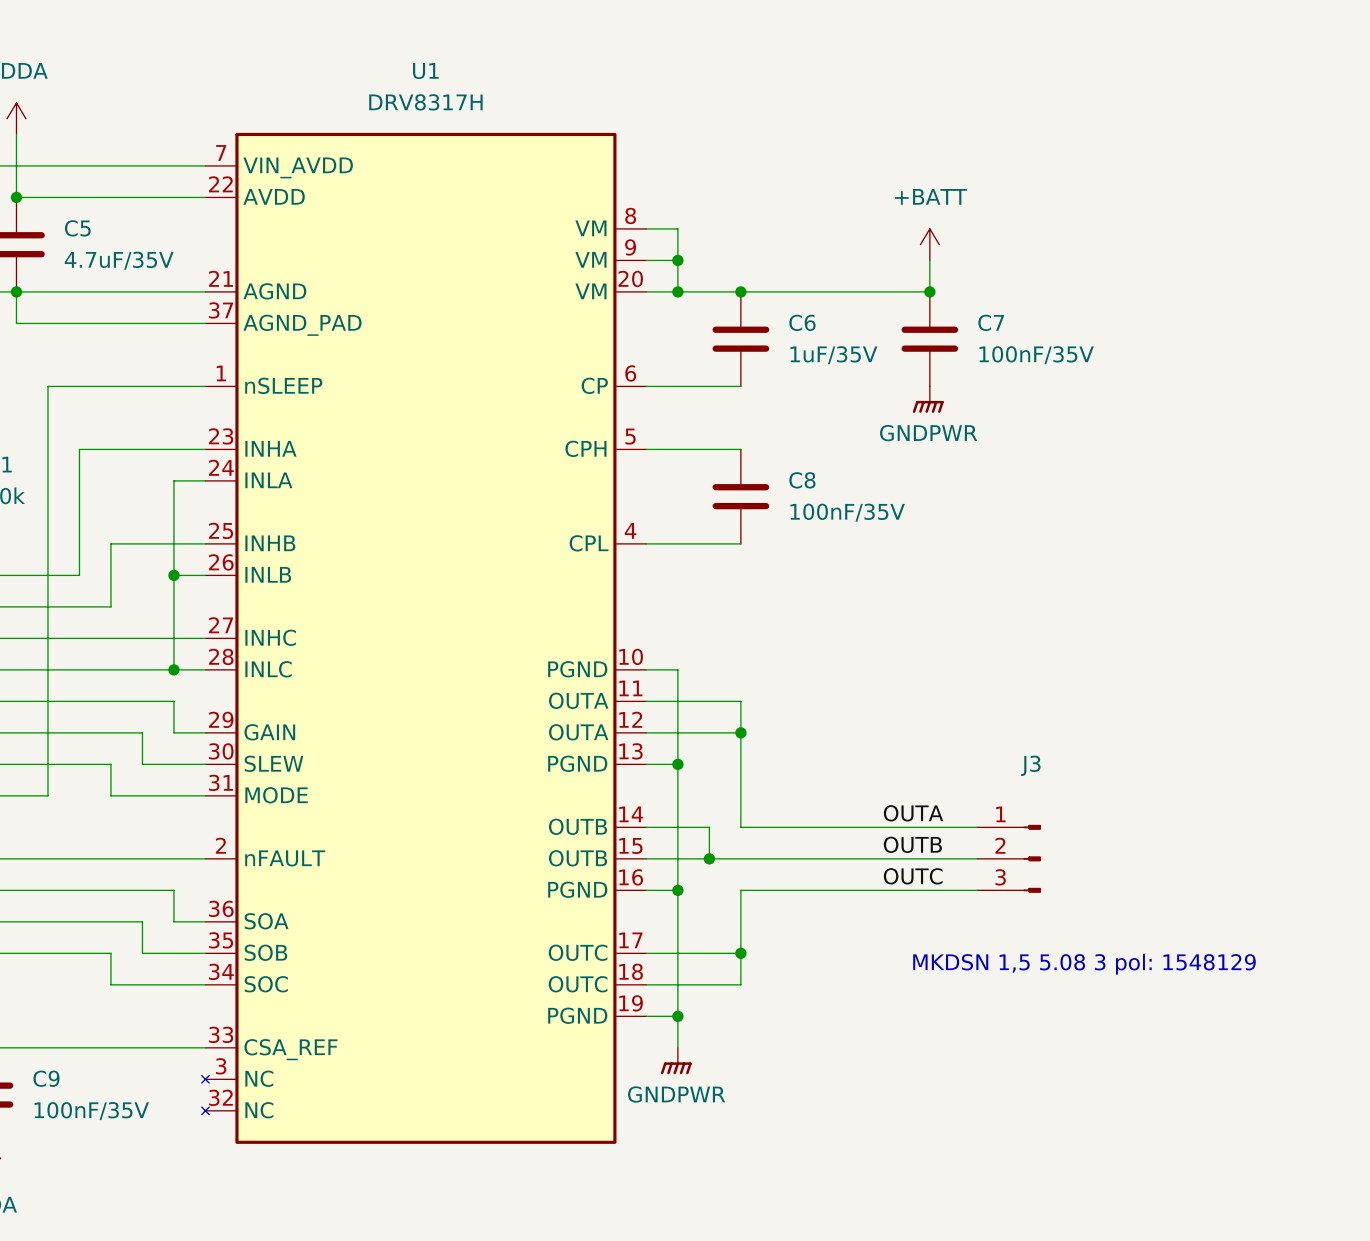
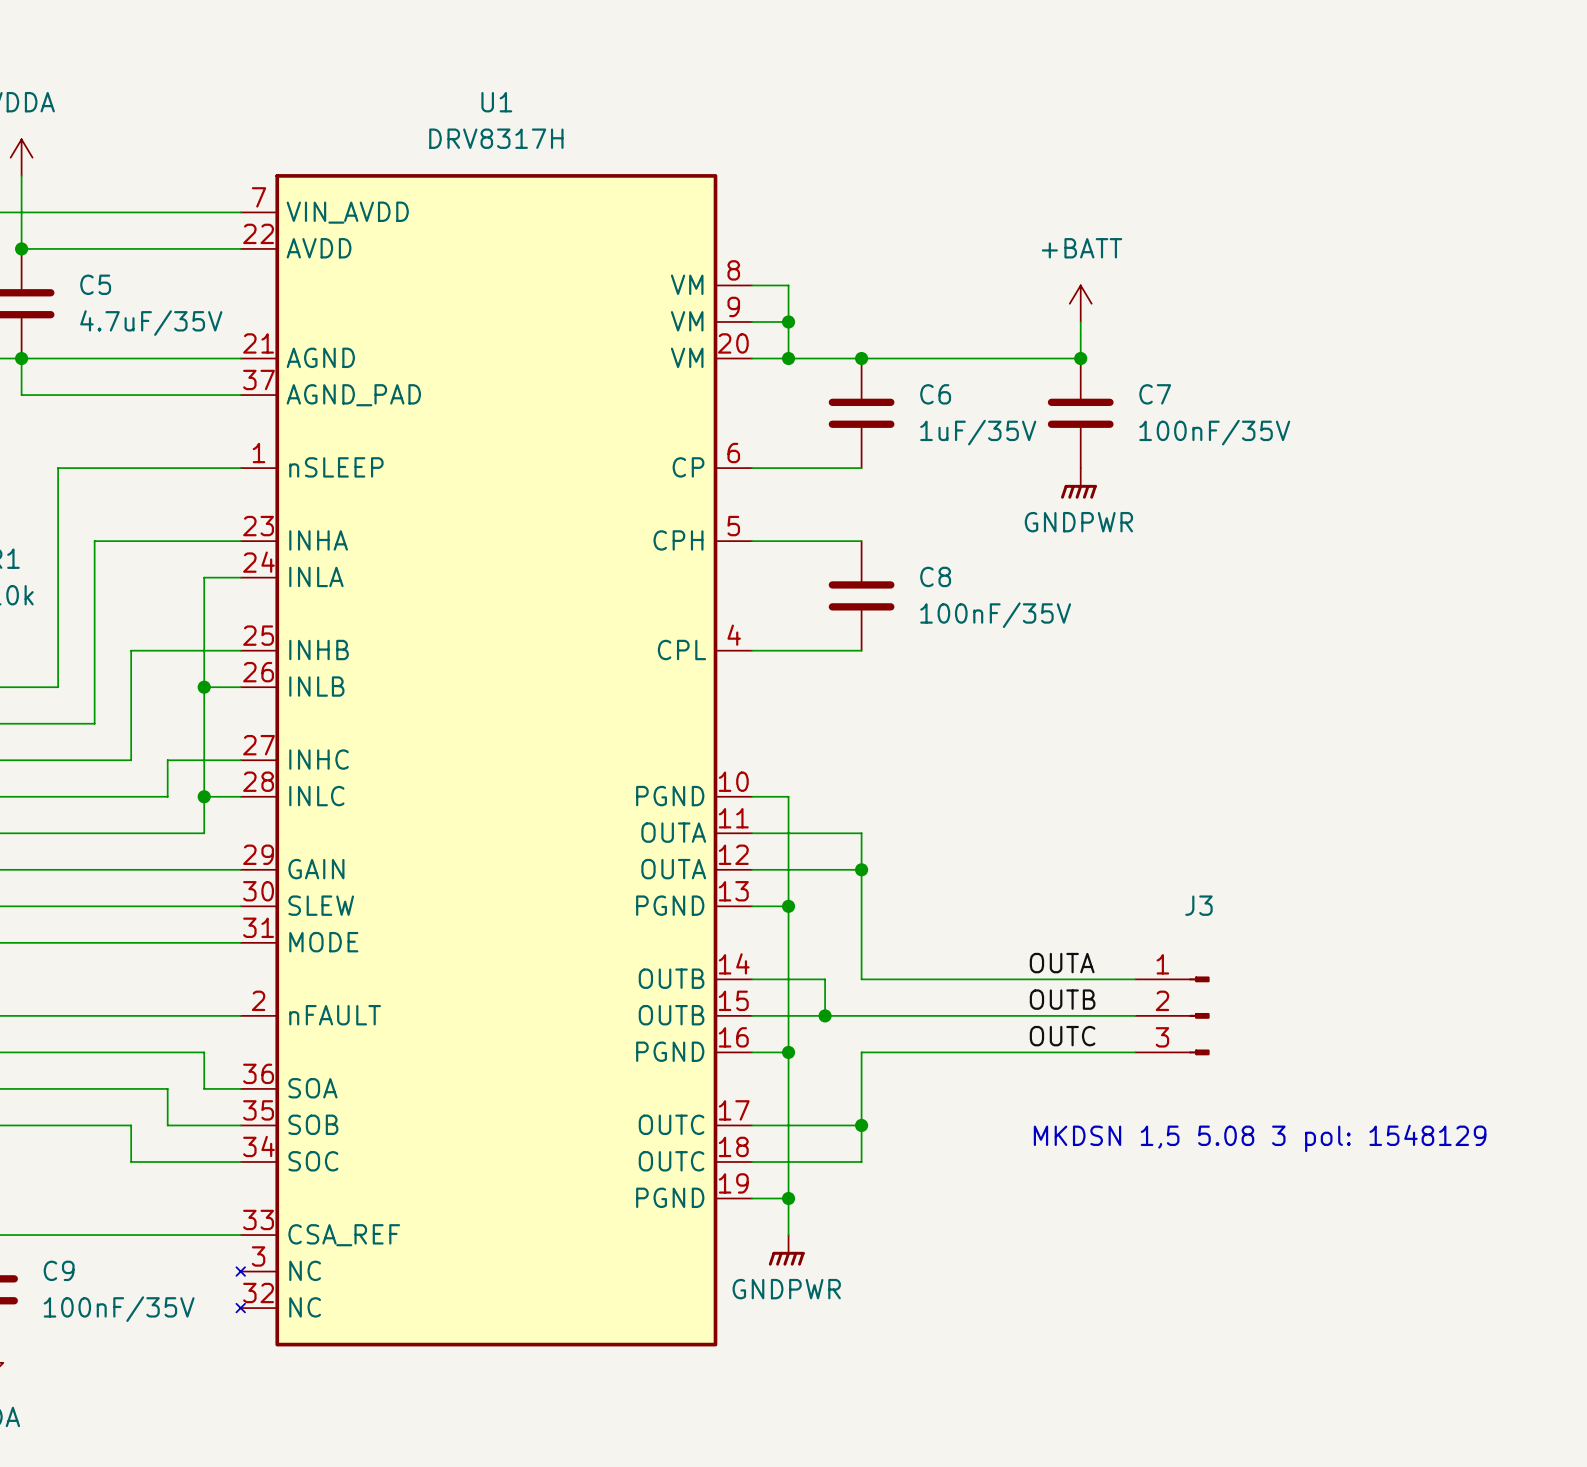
wire: (79, 575) (47, 575) (47, 795) -> (131, 942) (58, 942)
wire: (79, 606) (110, 606) -> (94, 723) (94, 687)
wire: (110, 638) (142, 638) -> (131, 760) (131, 723)
wire: (142, 669) (173, 669) -> (167, 796) (167, 760)
wire: (173, 701) (173, 732) -> (167, 869) (204, 869)
wire: (142, 732) (142, 764) -> (204, 796) (204, 833)
wire: (110, 764) (110, 795) -> (131, 906) (167, 906)

